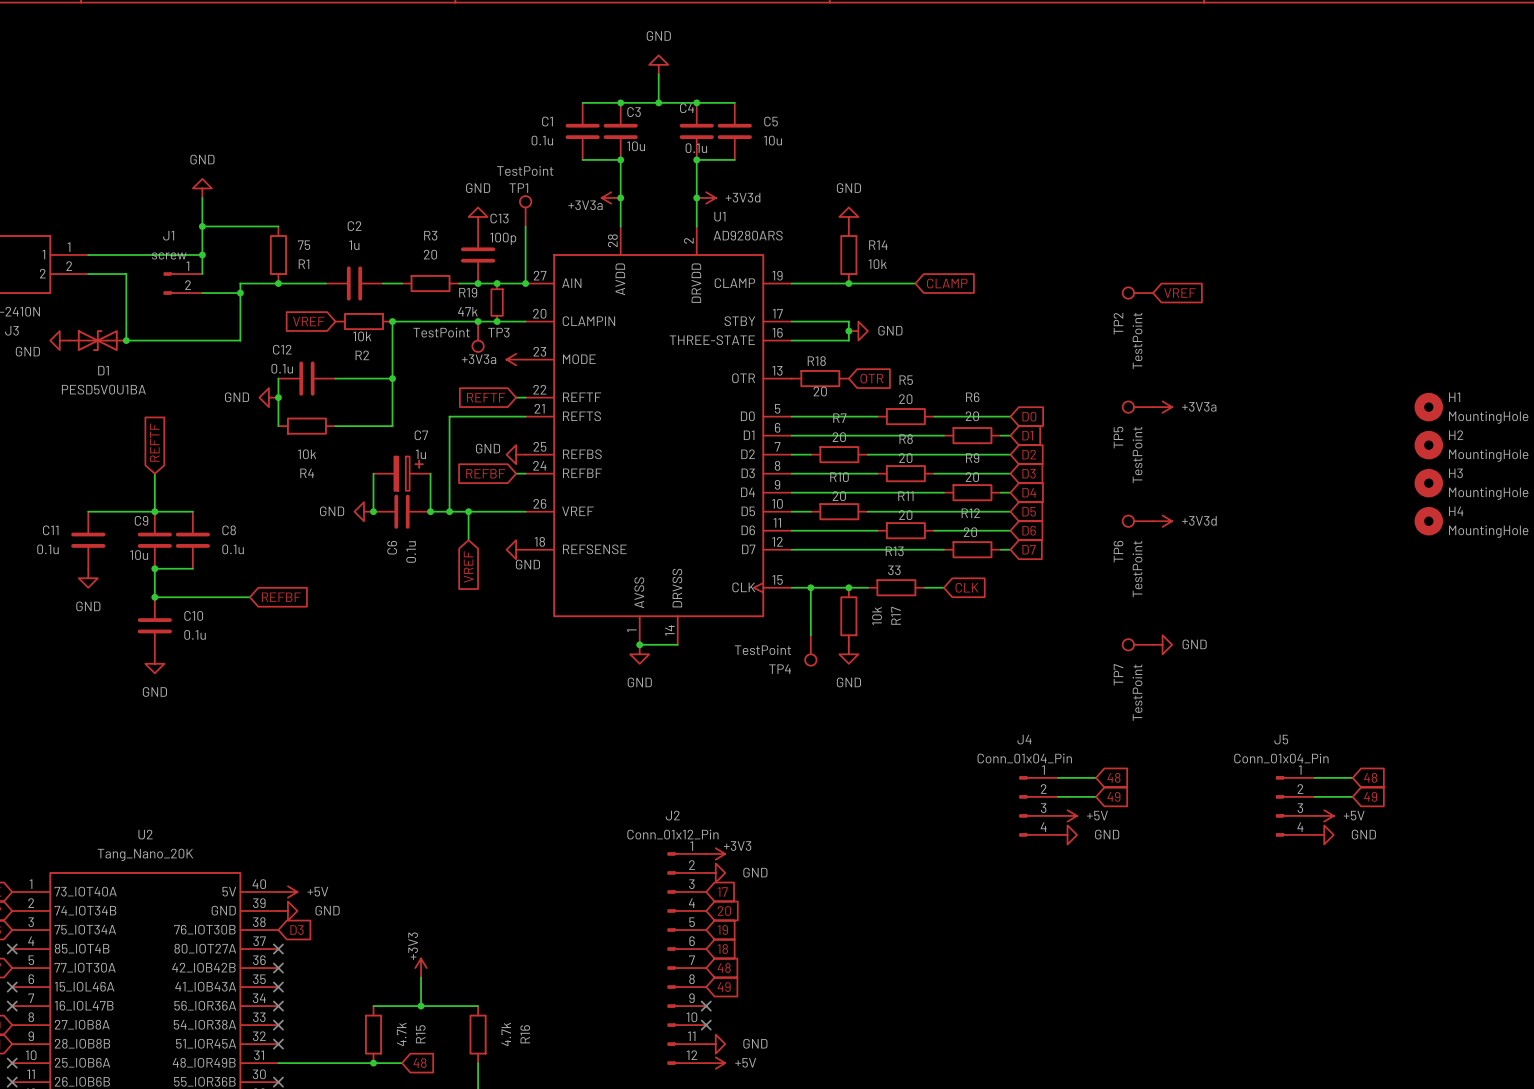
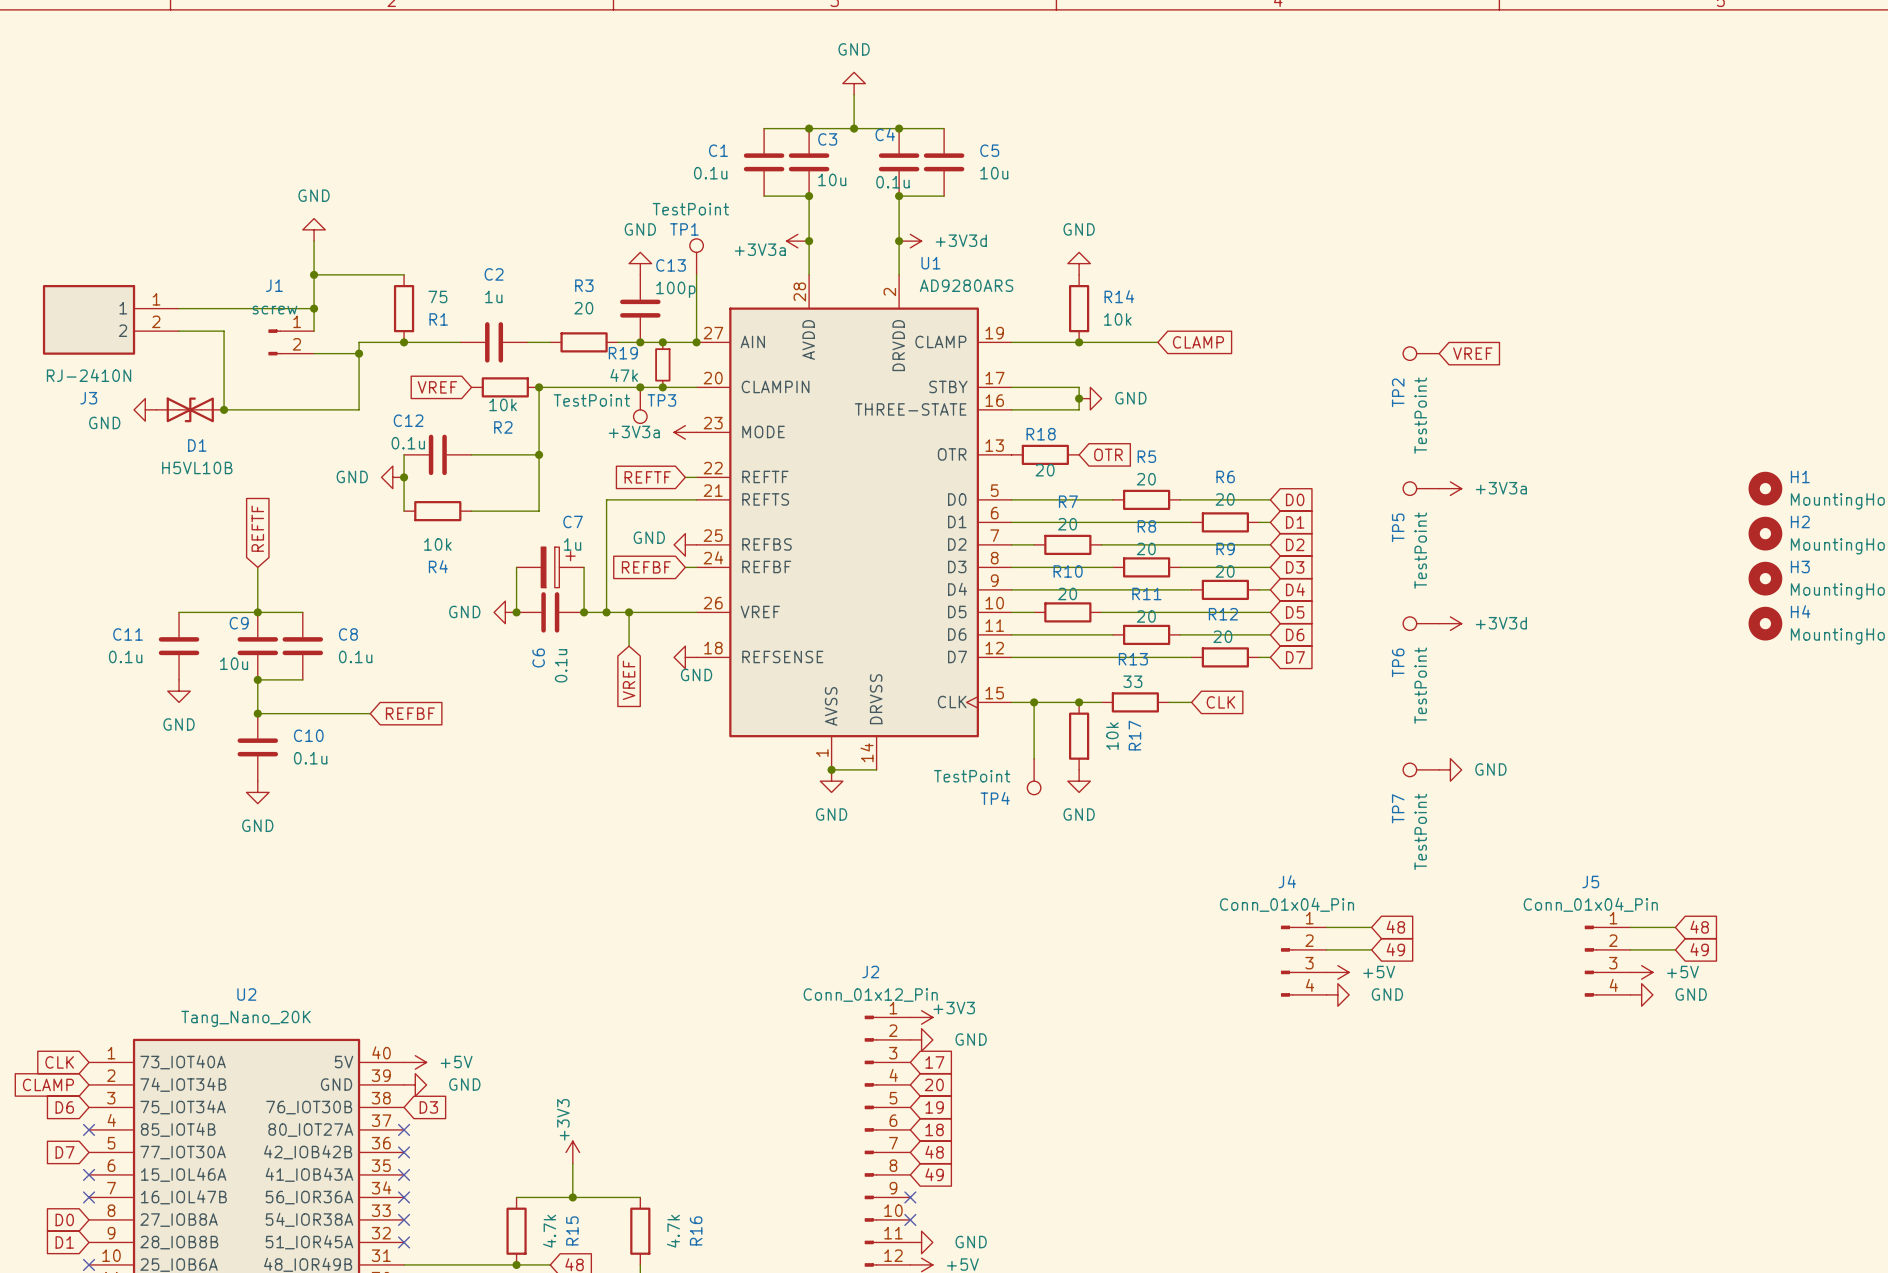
D1 value: PESD5V0U1BA (103, 389) -> H5VL10B (197, 467)

